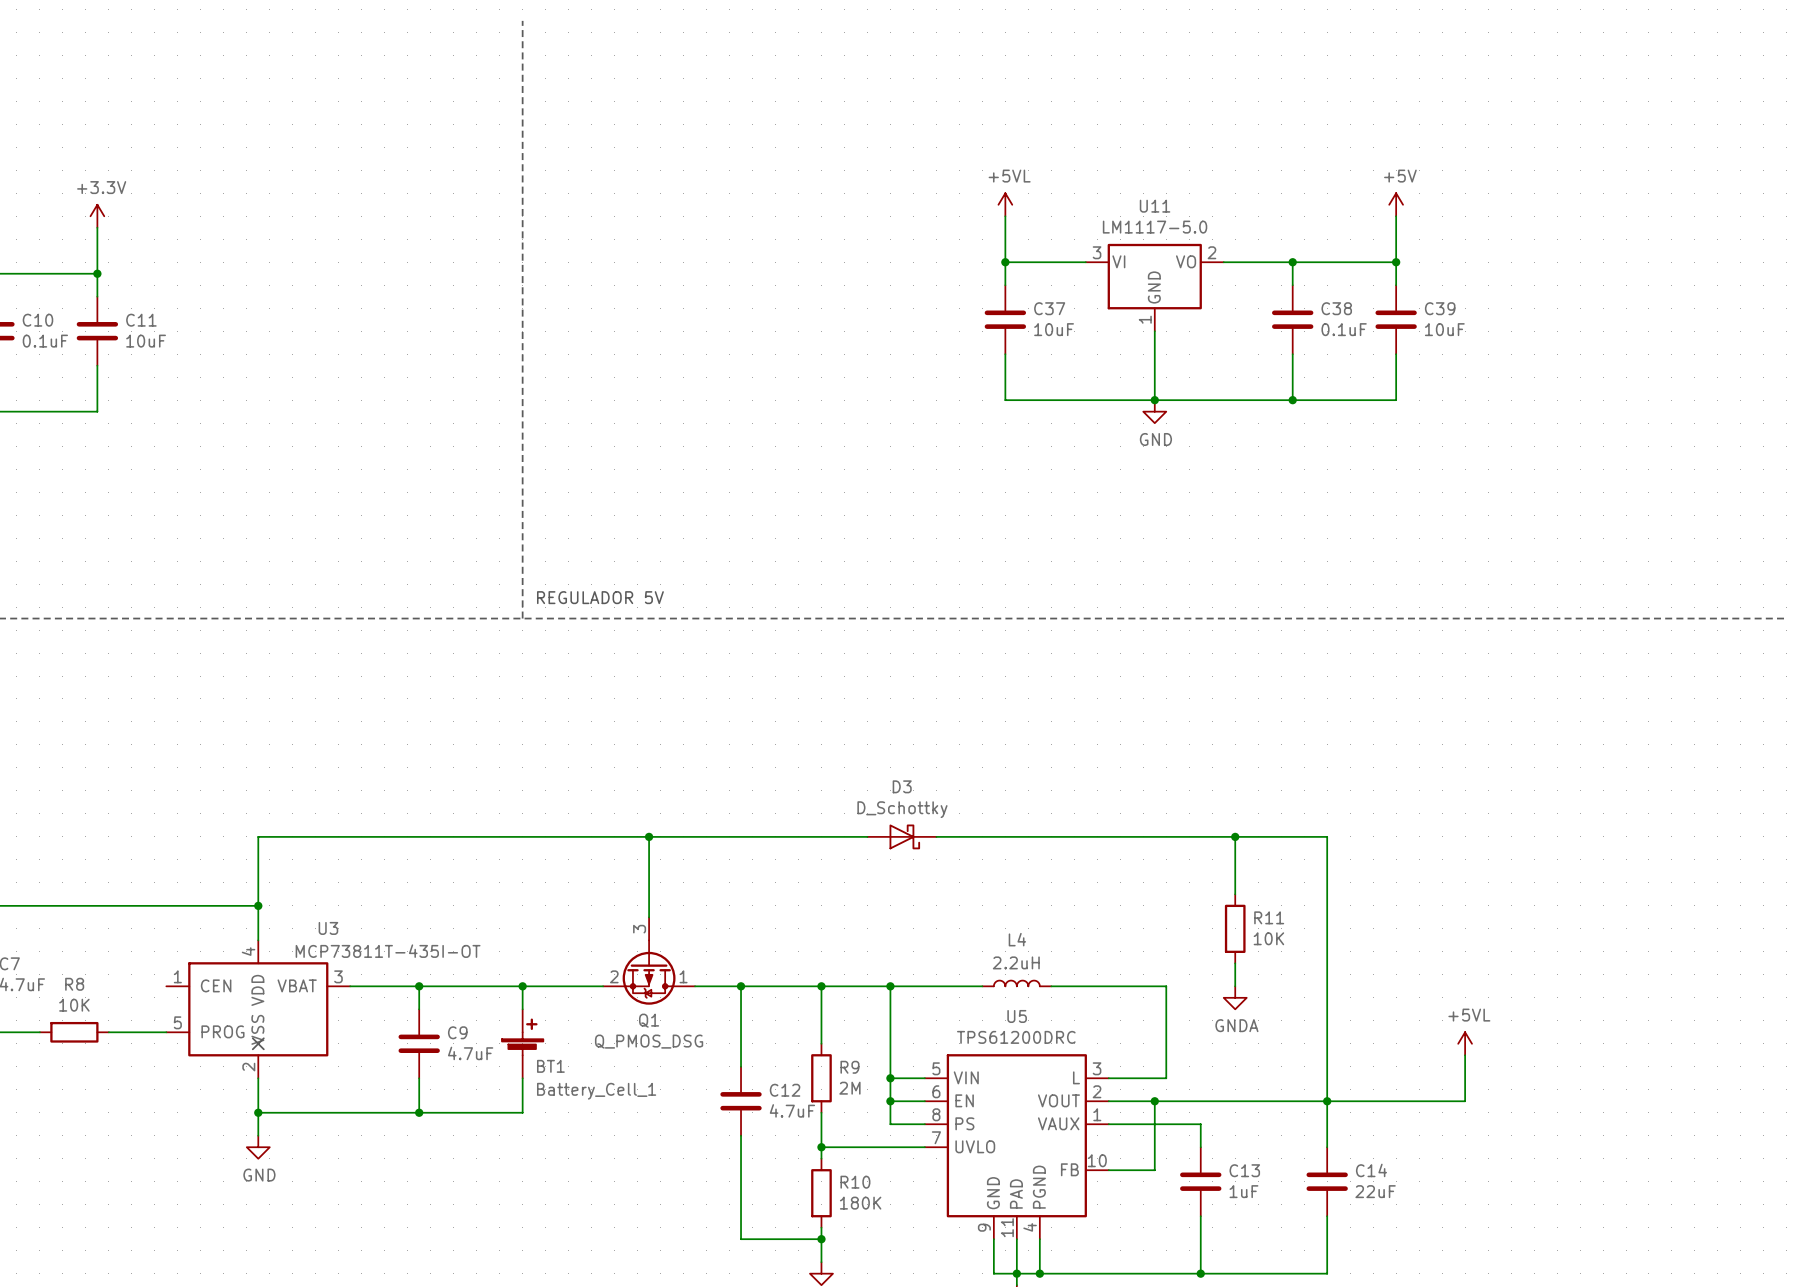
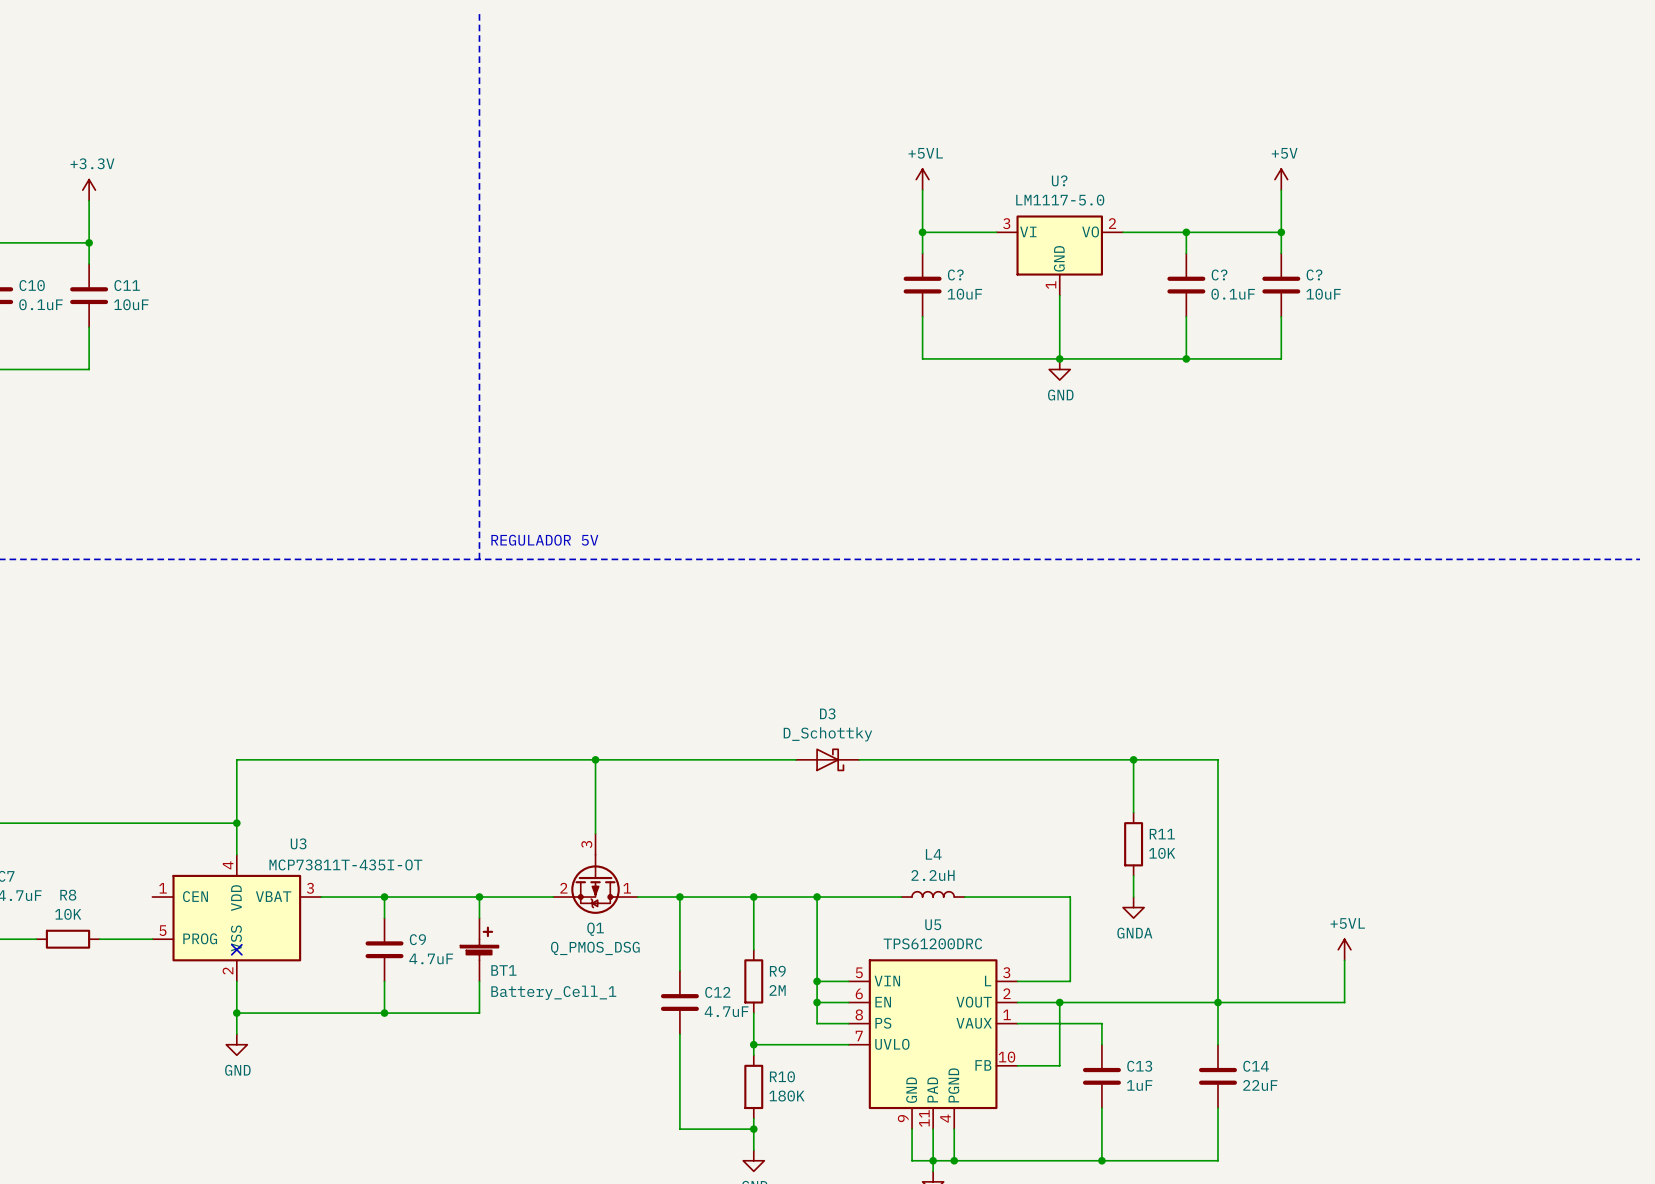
U11 name: U11 (1155, 206) -> U? (1059, 180)
C37 name: C37 (1049, 308) -> C? (955, 274)
C38 name: C38 (1336, 308) -> C? (1219, 274)
C39 name: C39 (1440, 308) -> C? (1314, 274)

